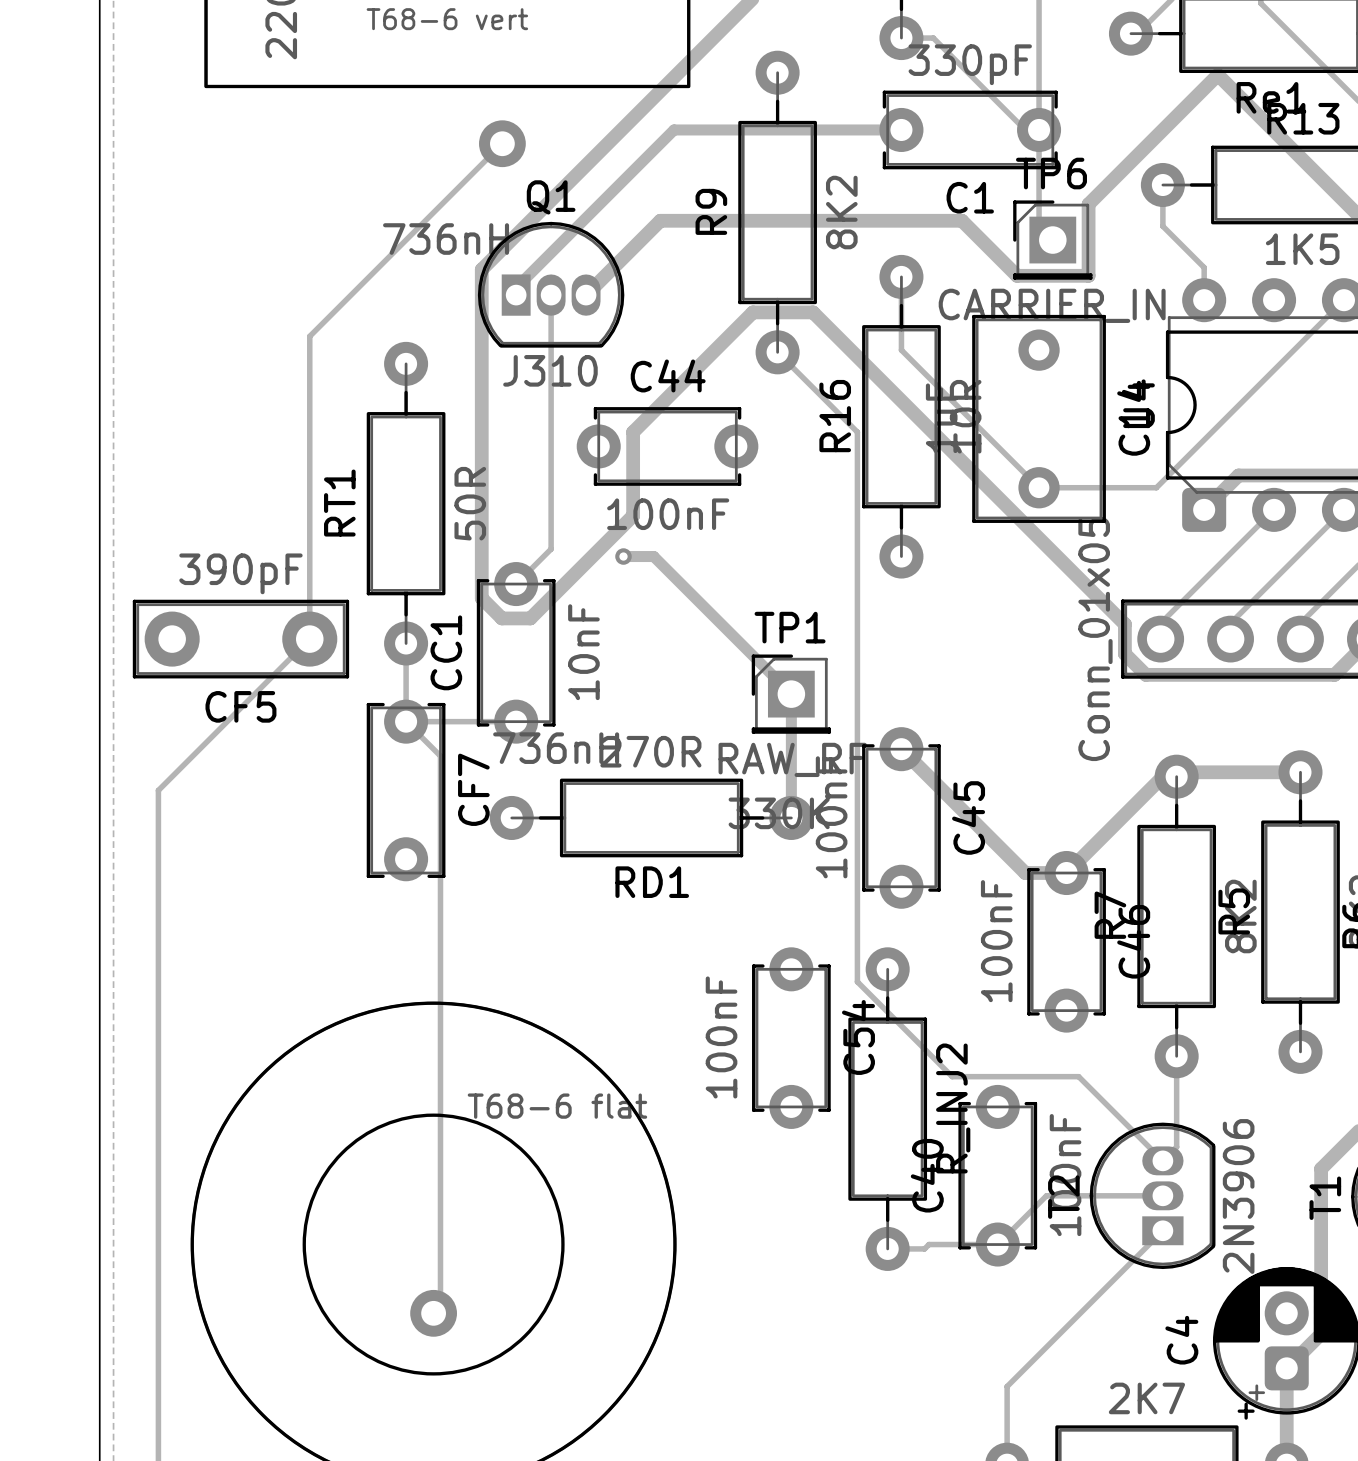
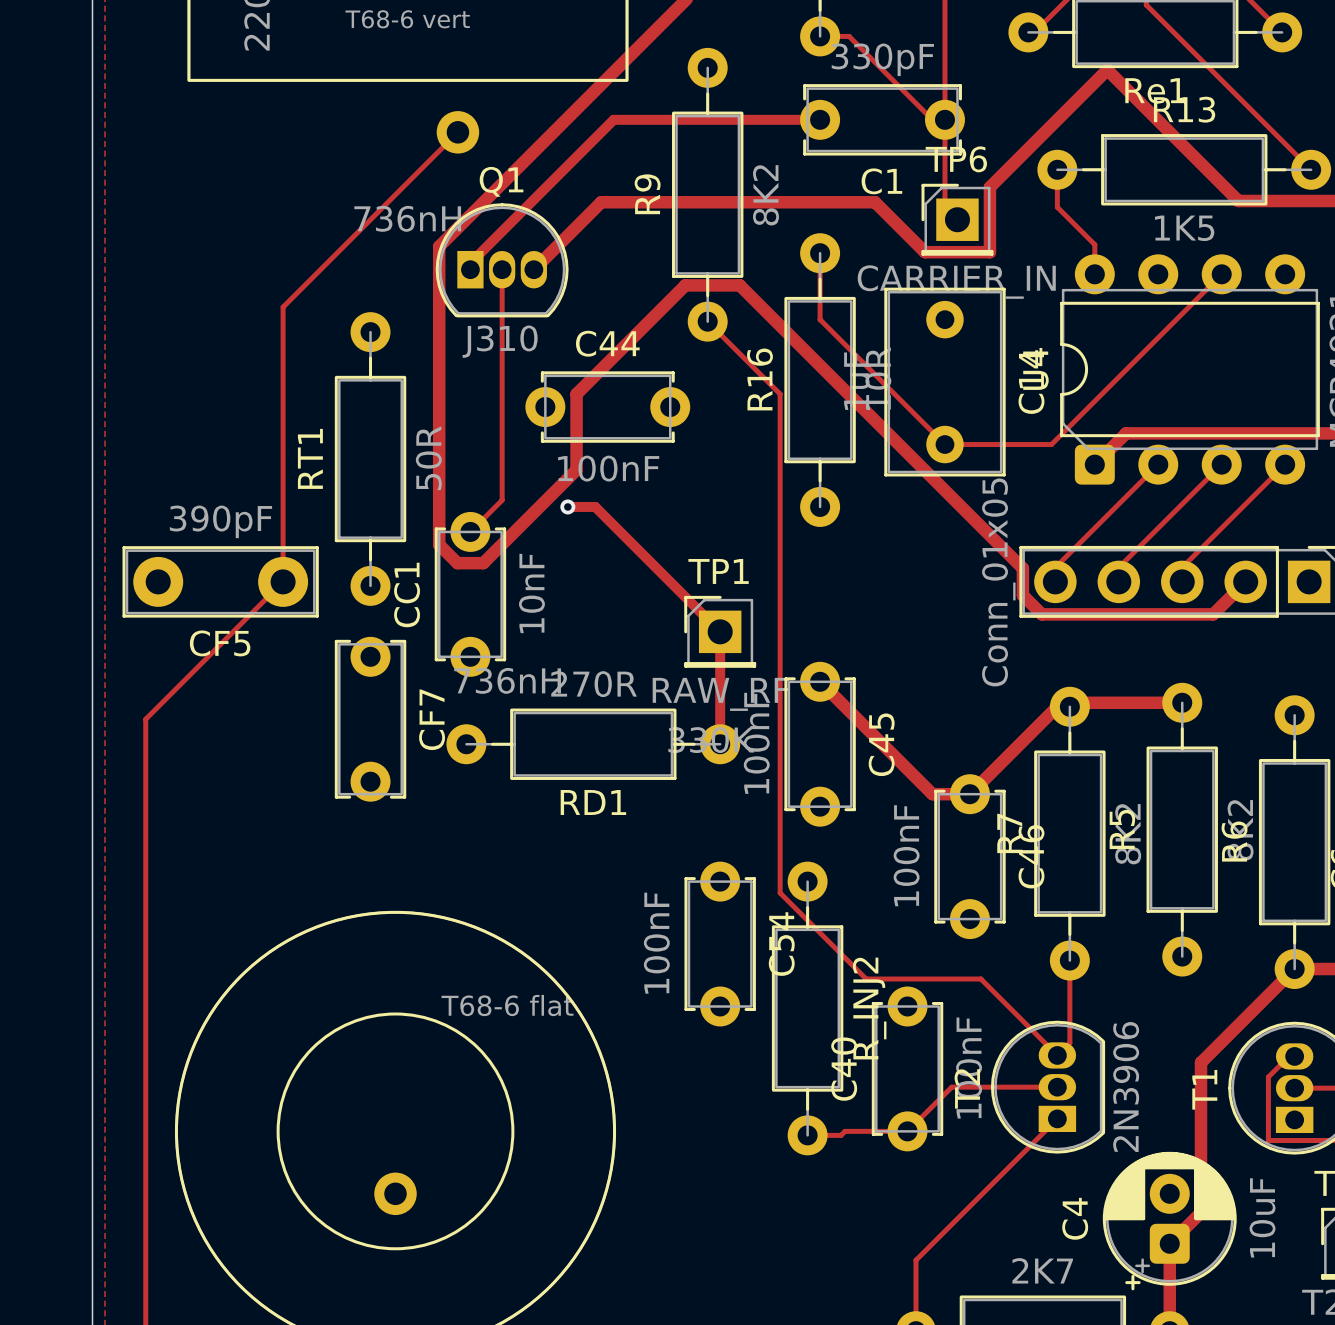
track: (406, 643) (406, 721) -> none
track: (406, 721) (440, 756) (440, 1306) (433, 1313) -> none
track: (406, 721) (516, 721) -> none

